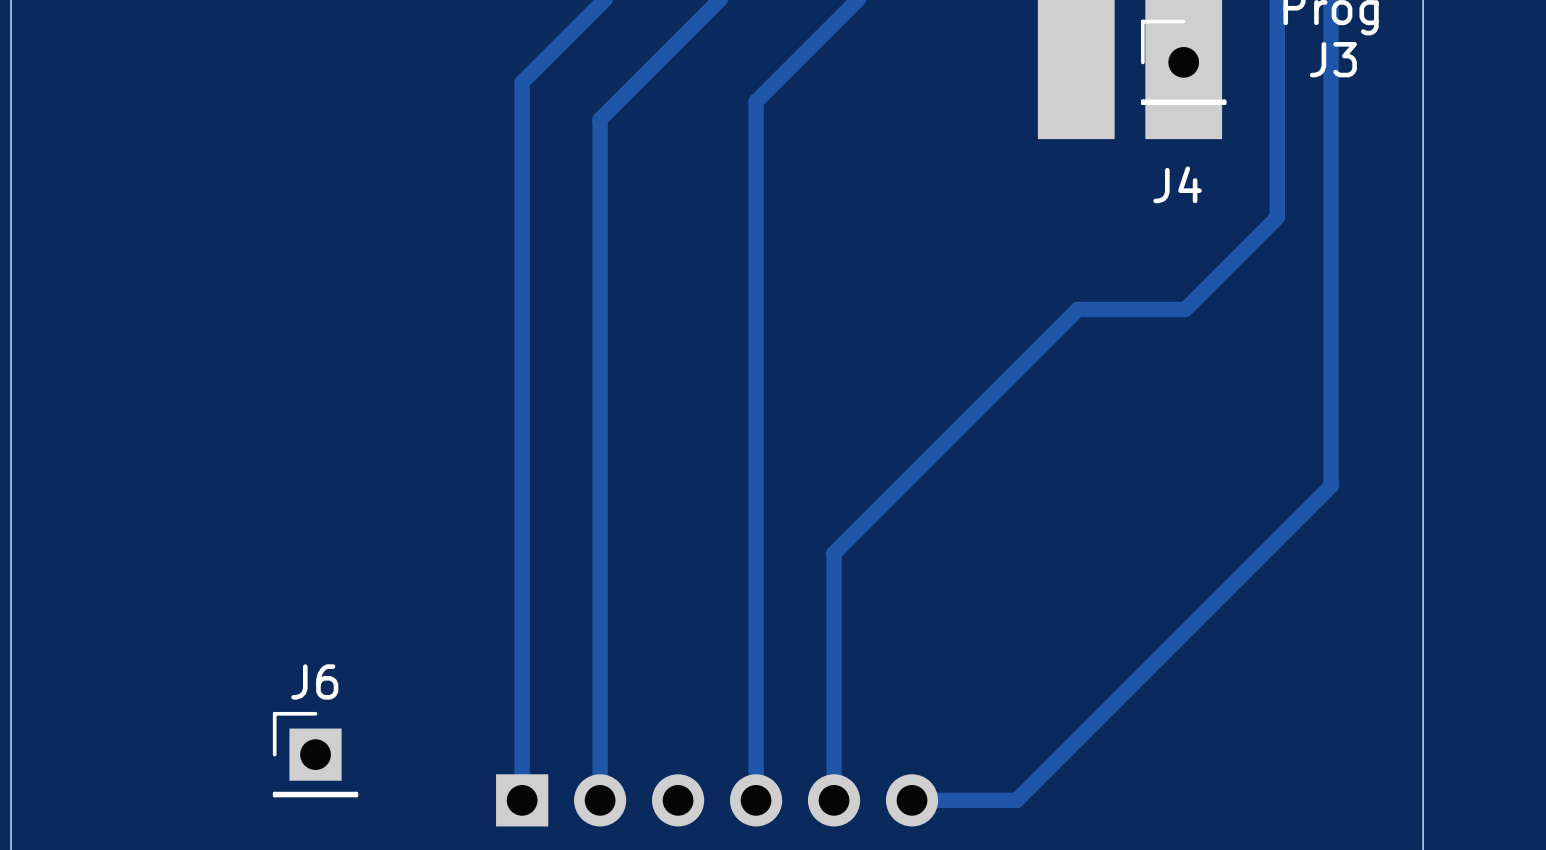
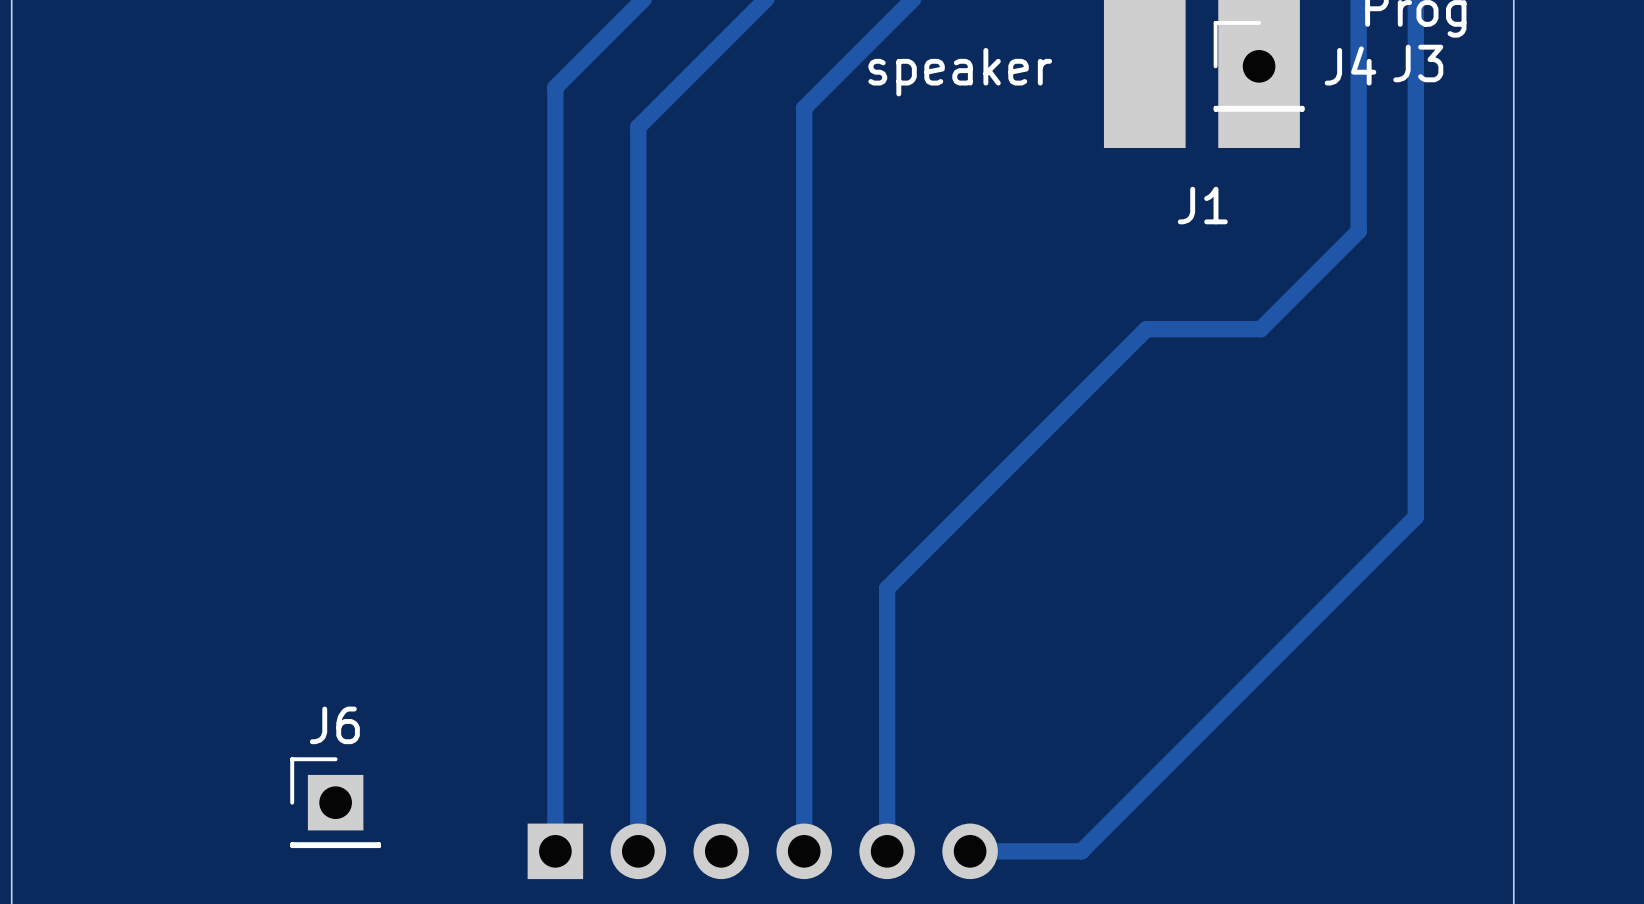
text: none -> speaker (960, 72)
J4 name position: J4 (1177, 184) -> J4 (1350, 65)
J1 name: none -> J1 (1202, 205)

